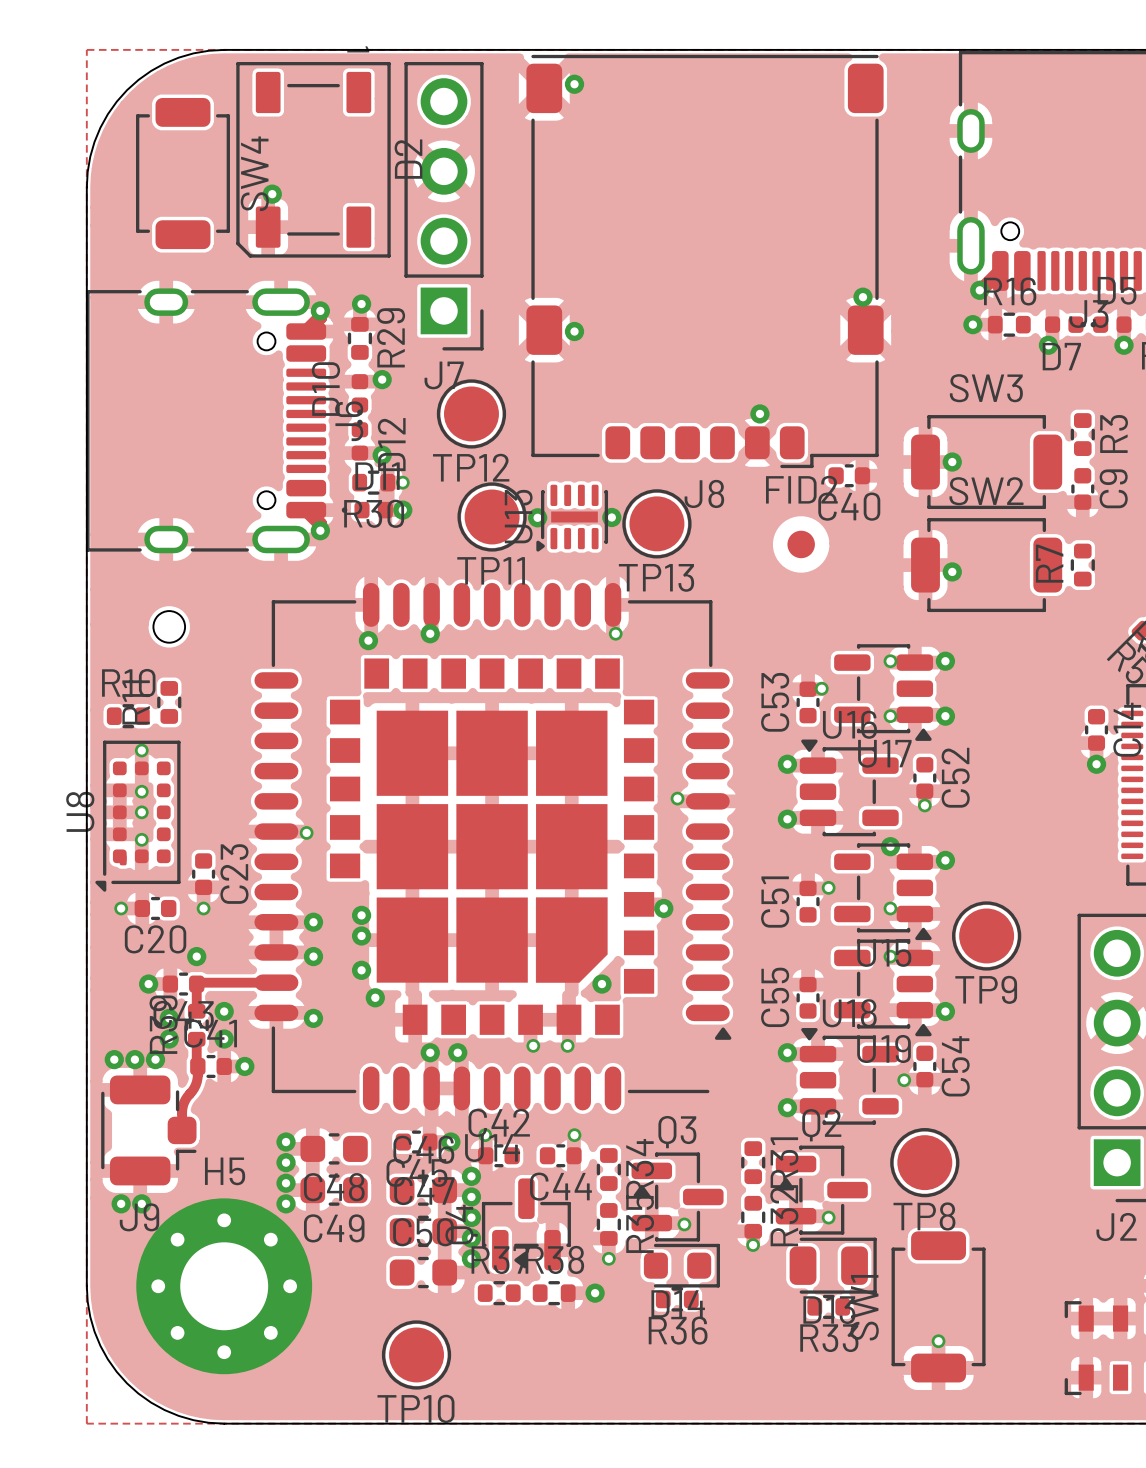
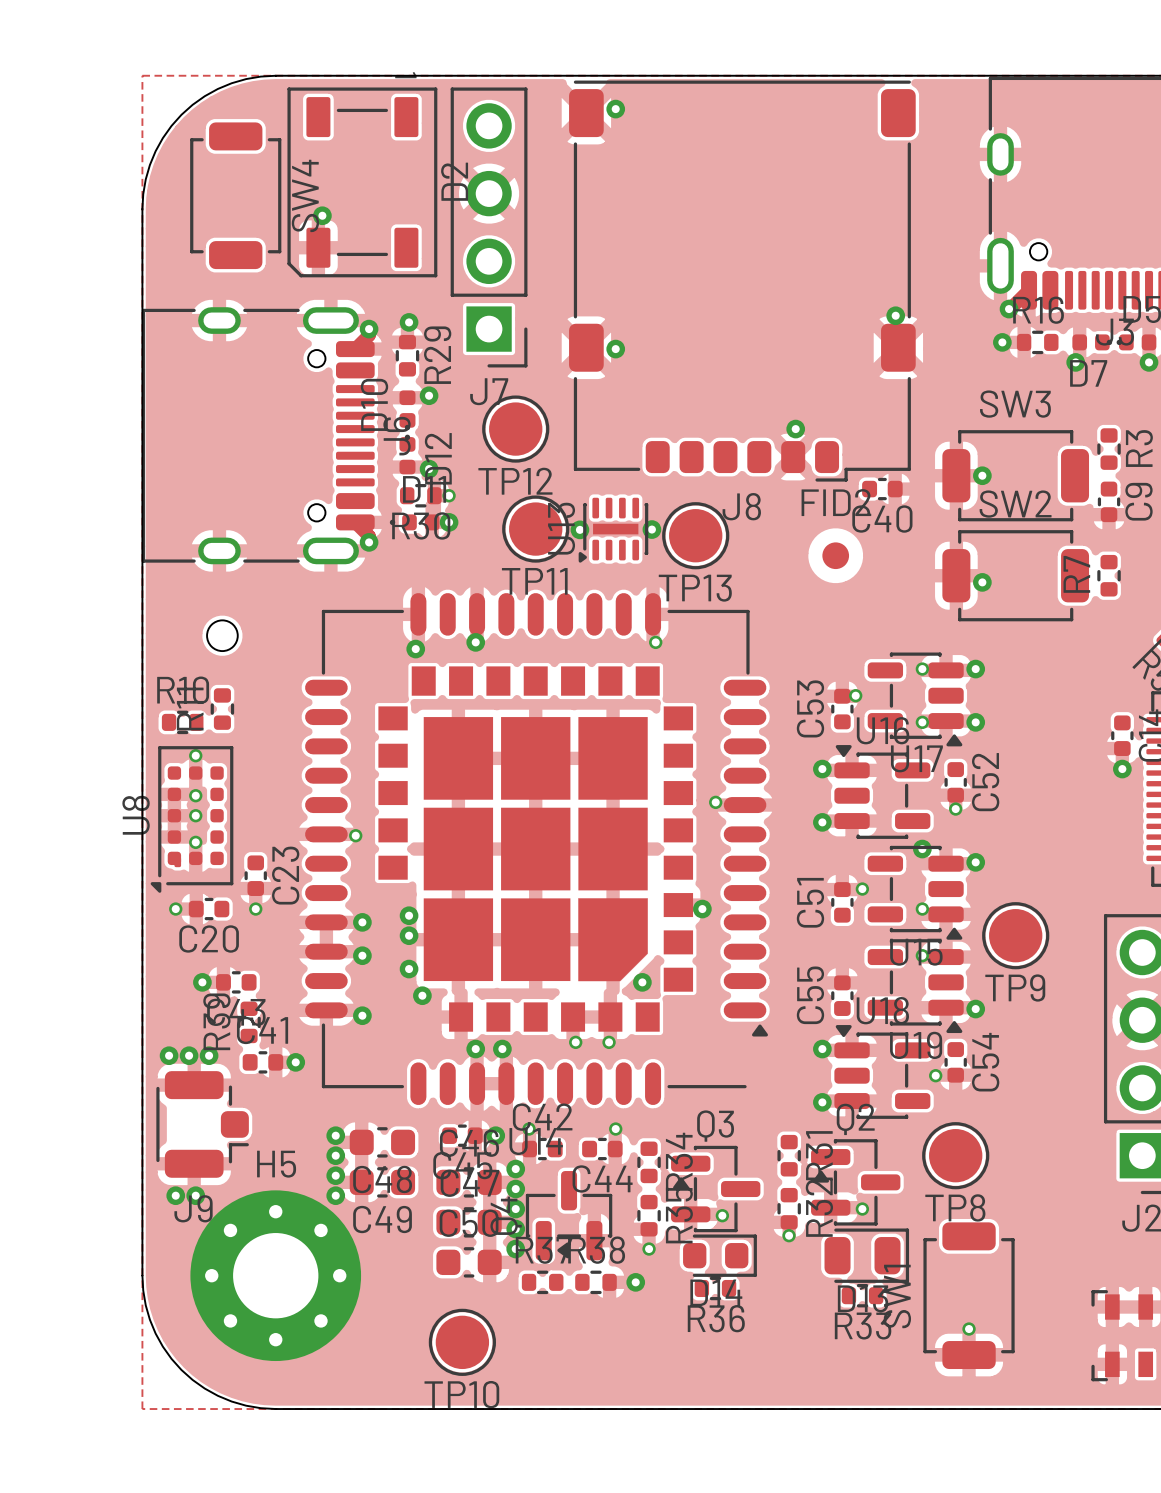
via: (196, 956) -> none
track: (276, 982) (198, 982) (196, 1011) -> none
via: (224, 1011) -> none
via: (169, 1018) -> none
via: (169, 1039) -> none
track: (196, 1039) (197, 1078) (194, 1088) (183, 1105) (182, 1130) -> none
via: (224, 1039) -> none

